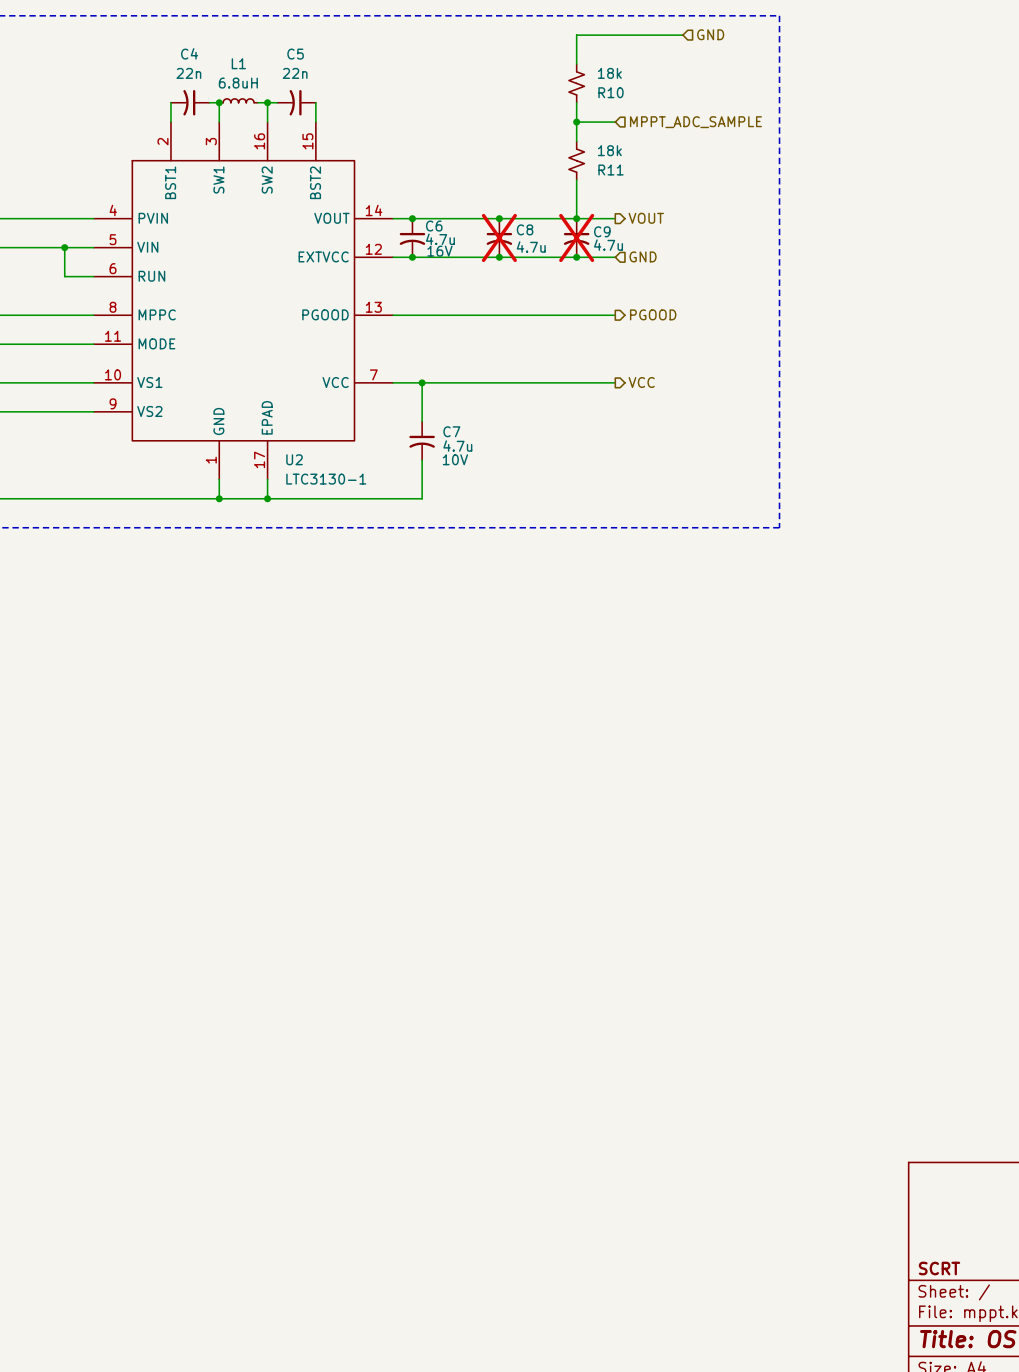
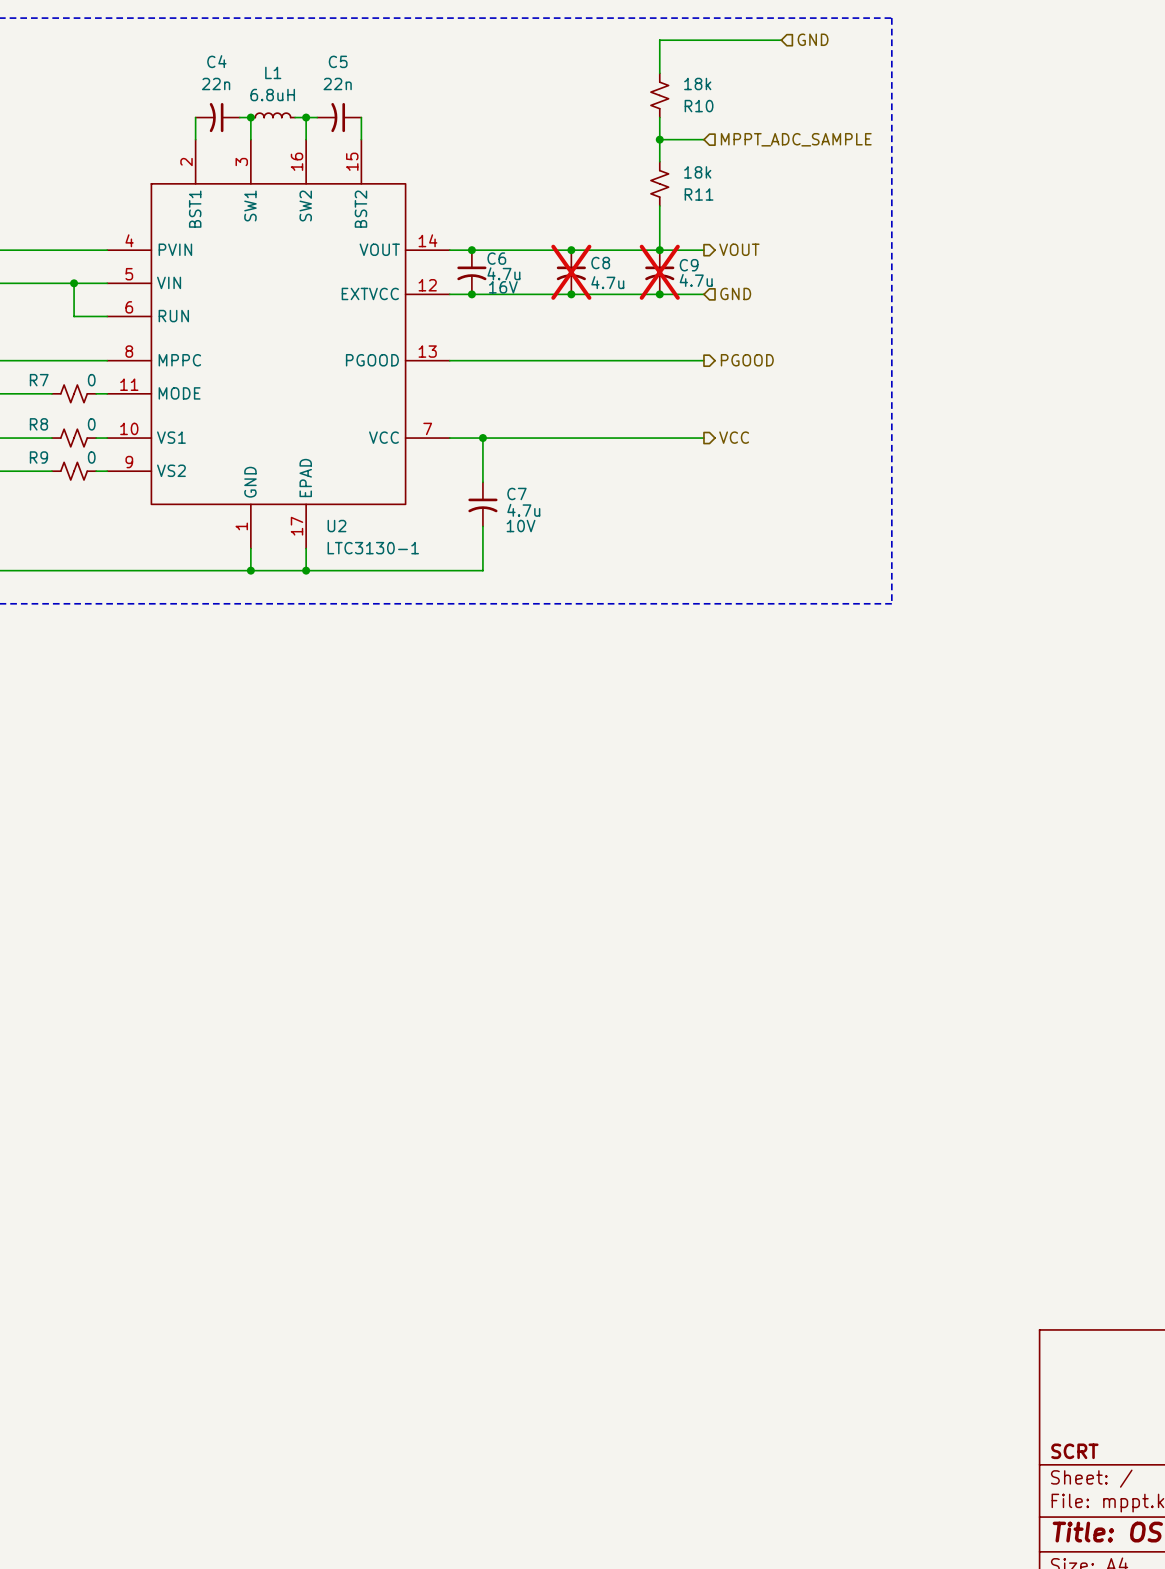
R7: none -> 0 (74, 393)
R8: none -> 0 (74, 438)
R9: none -> 0 (74, 471)

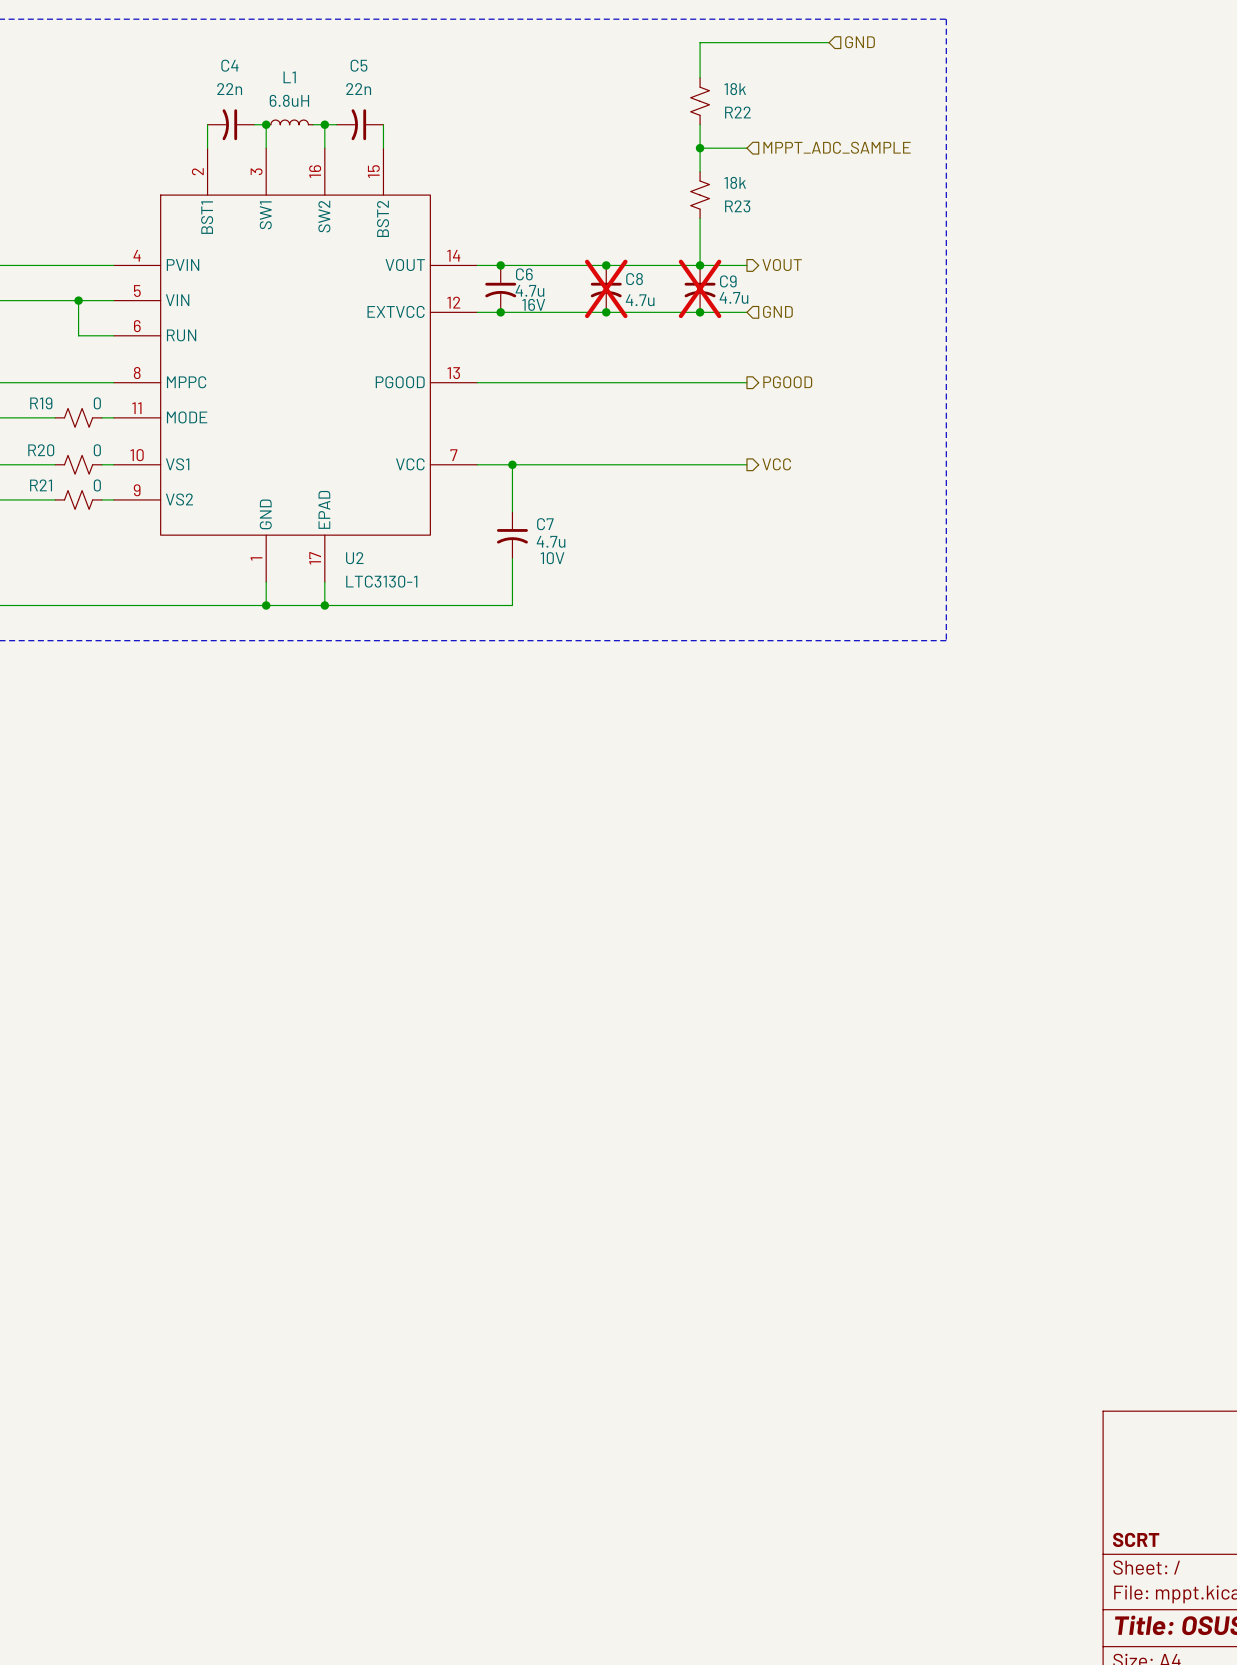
R10 name: R10 (699, 106) -> R22 (737, 112)
R11 name: R11 (699, 194) -> R23 (737, 206)
R7 name: R7 (39, 380) -> R19 (41, 403)
R8 name: R8 (38, 424) -> R20 (41, 450)
R9 name: R9 (38, 457) -> R21 (41, 485)

